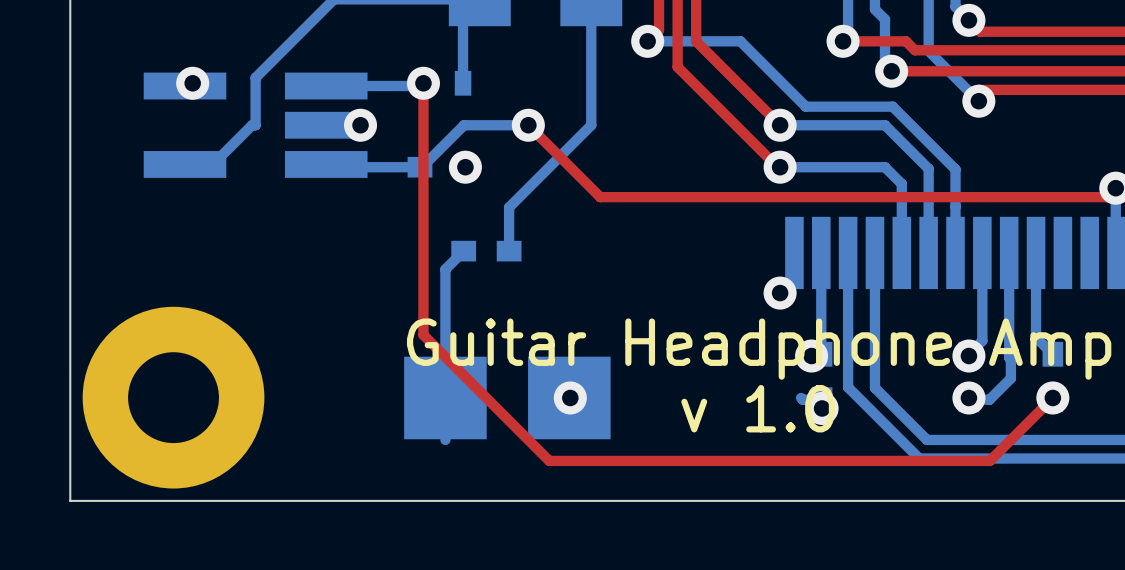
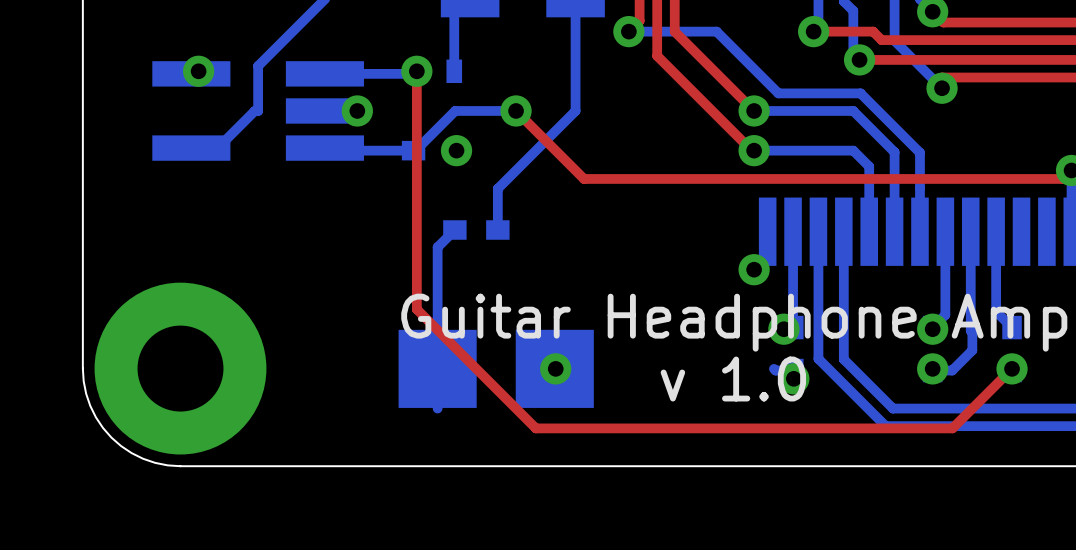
board edge: (70, 397) (70, 500) (173, 500) -> (82, 368) (83, 381) (90, 405) (103, 428) (111, 437) (121, 446) (143, 458) (167, 465) (180, 466)

